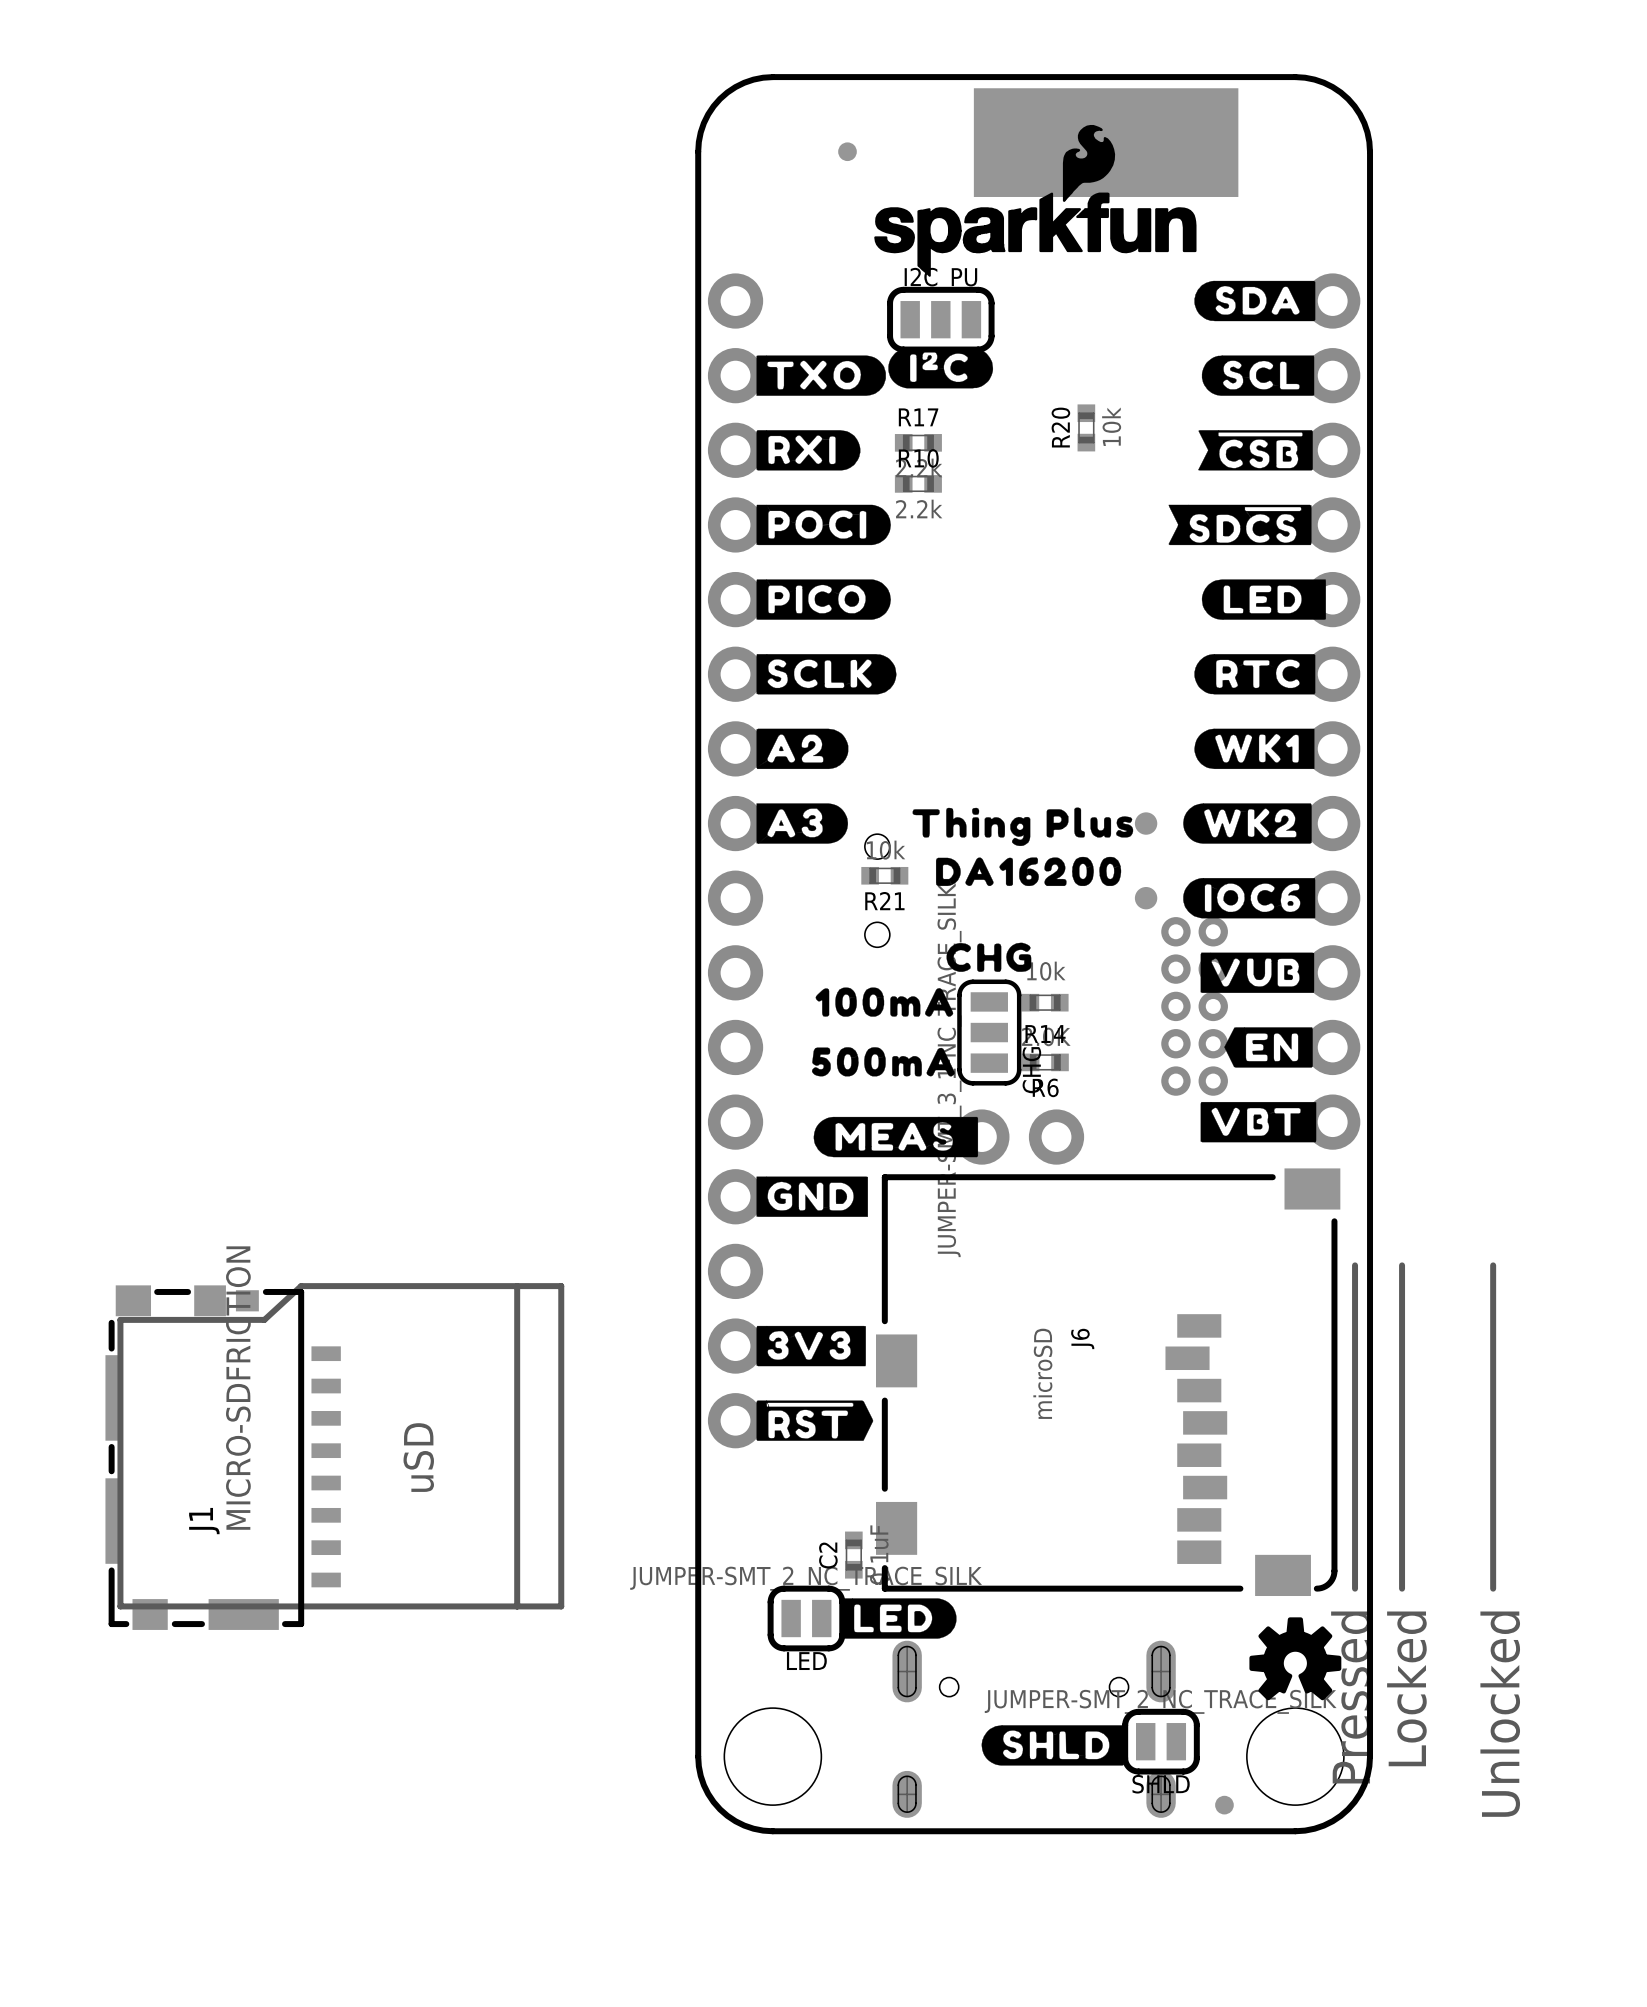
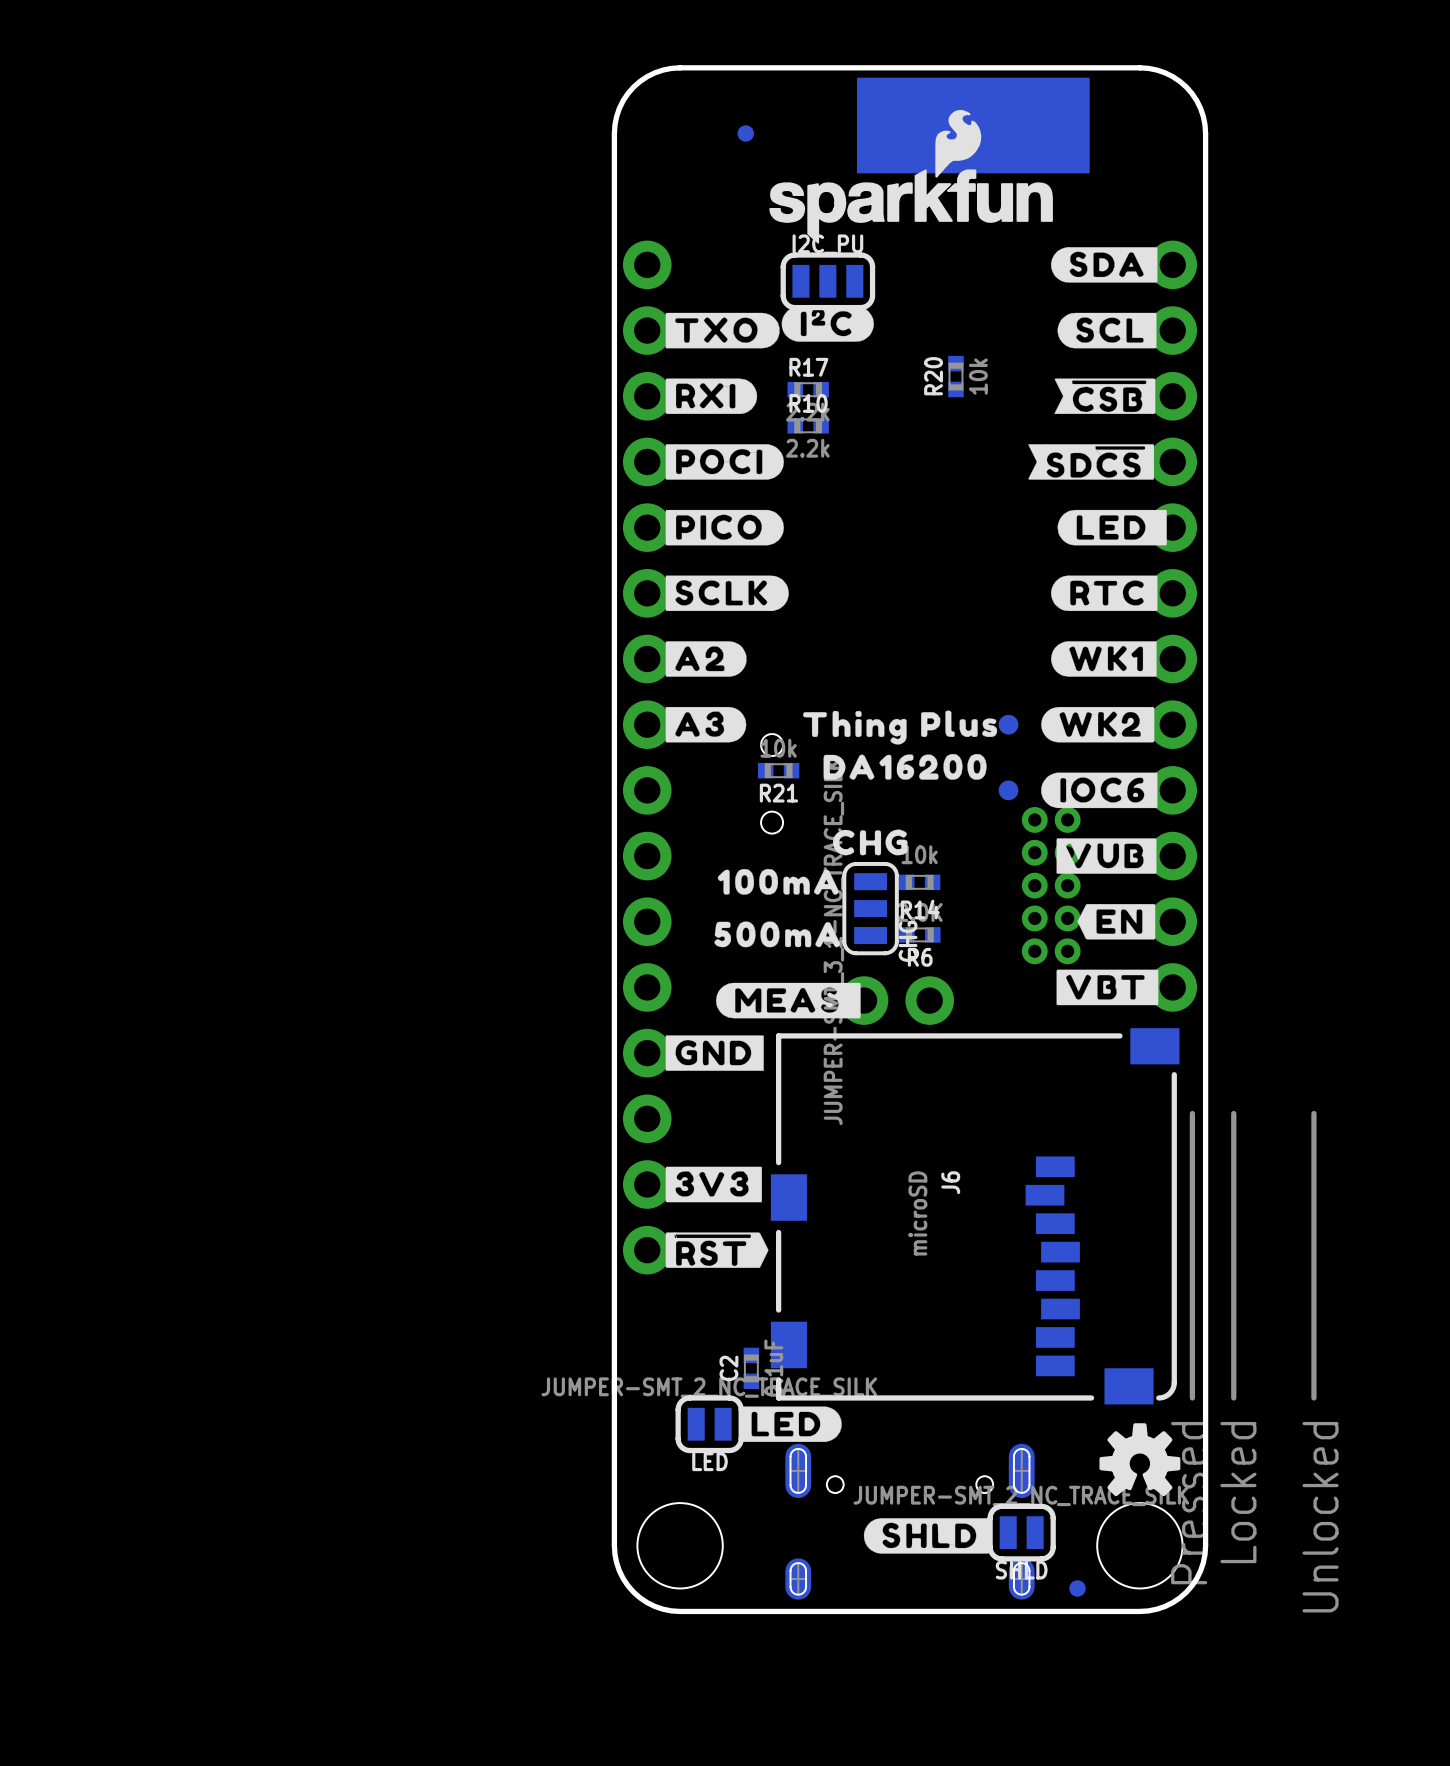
J1: MICRO-SDFRICTION (334, 1456) -> none

